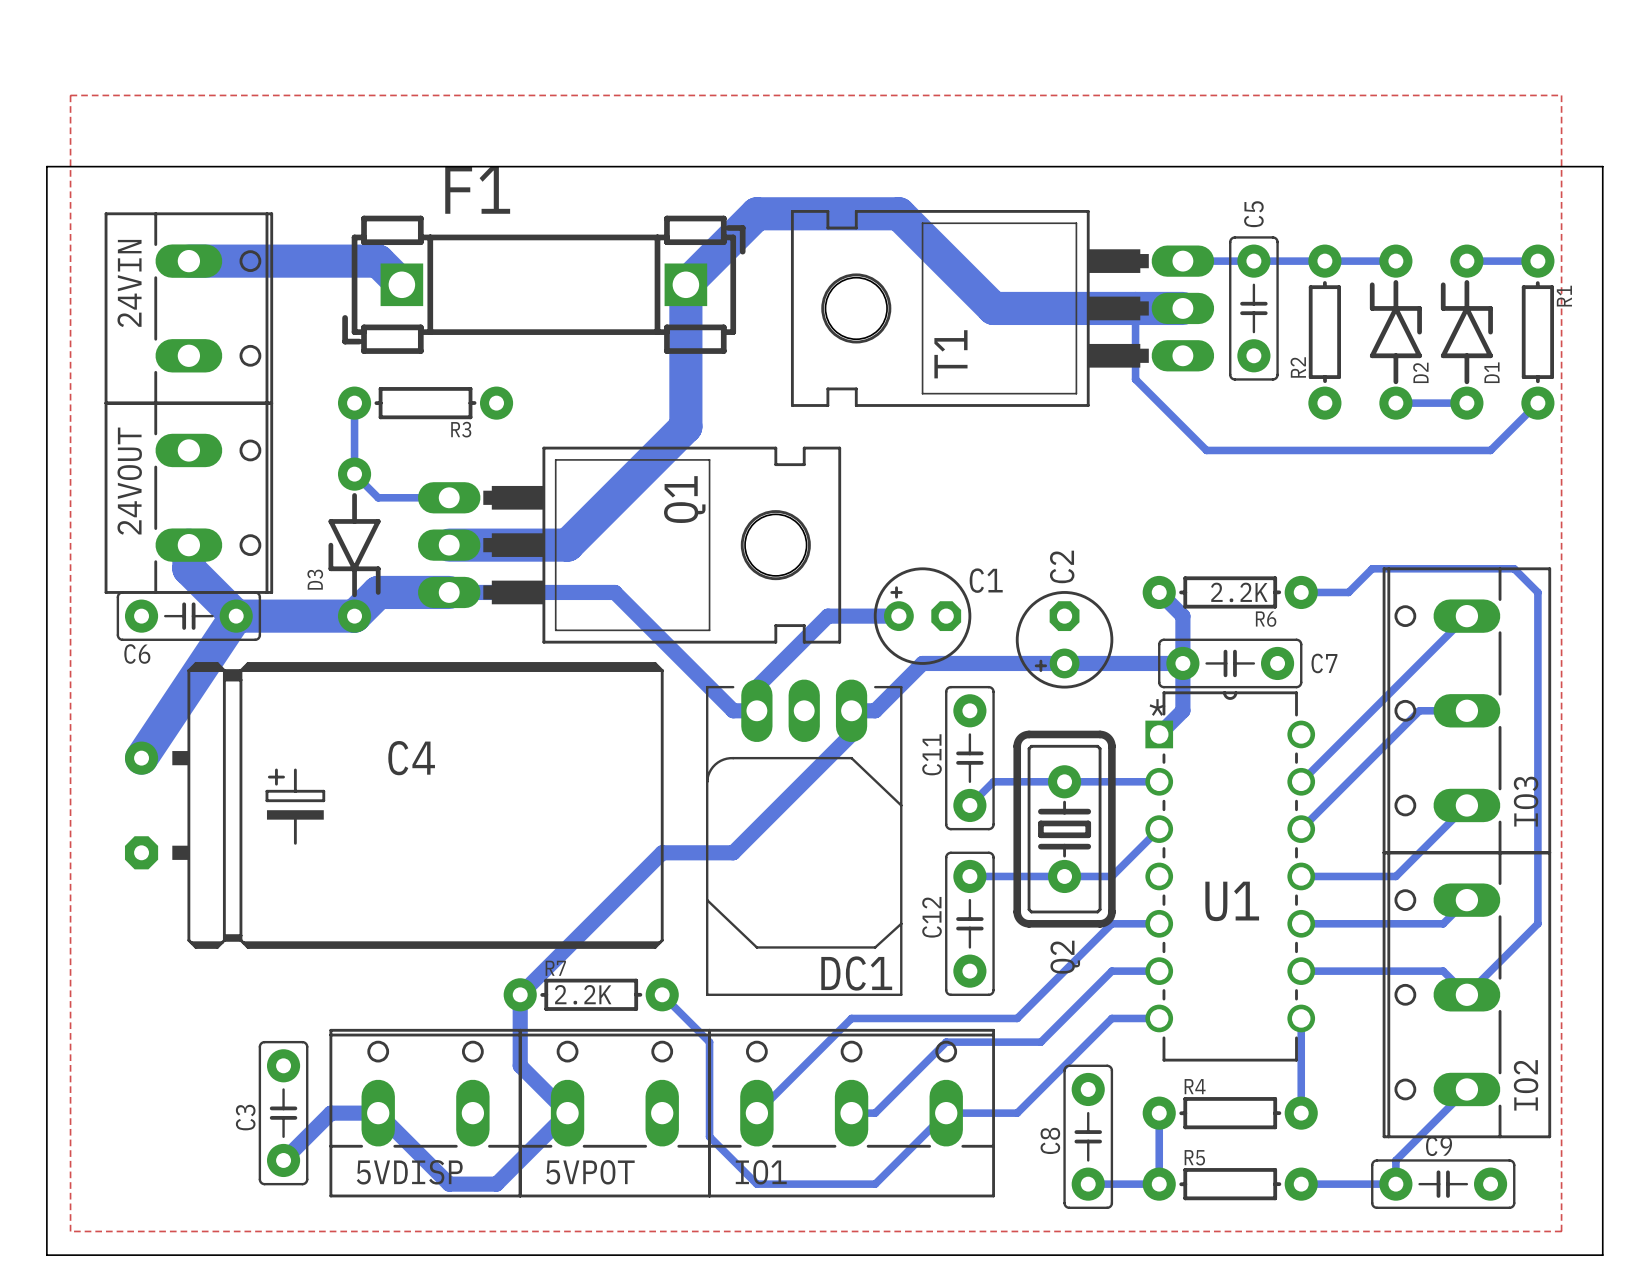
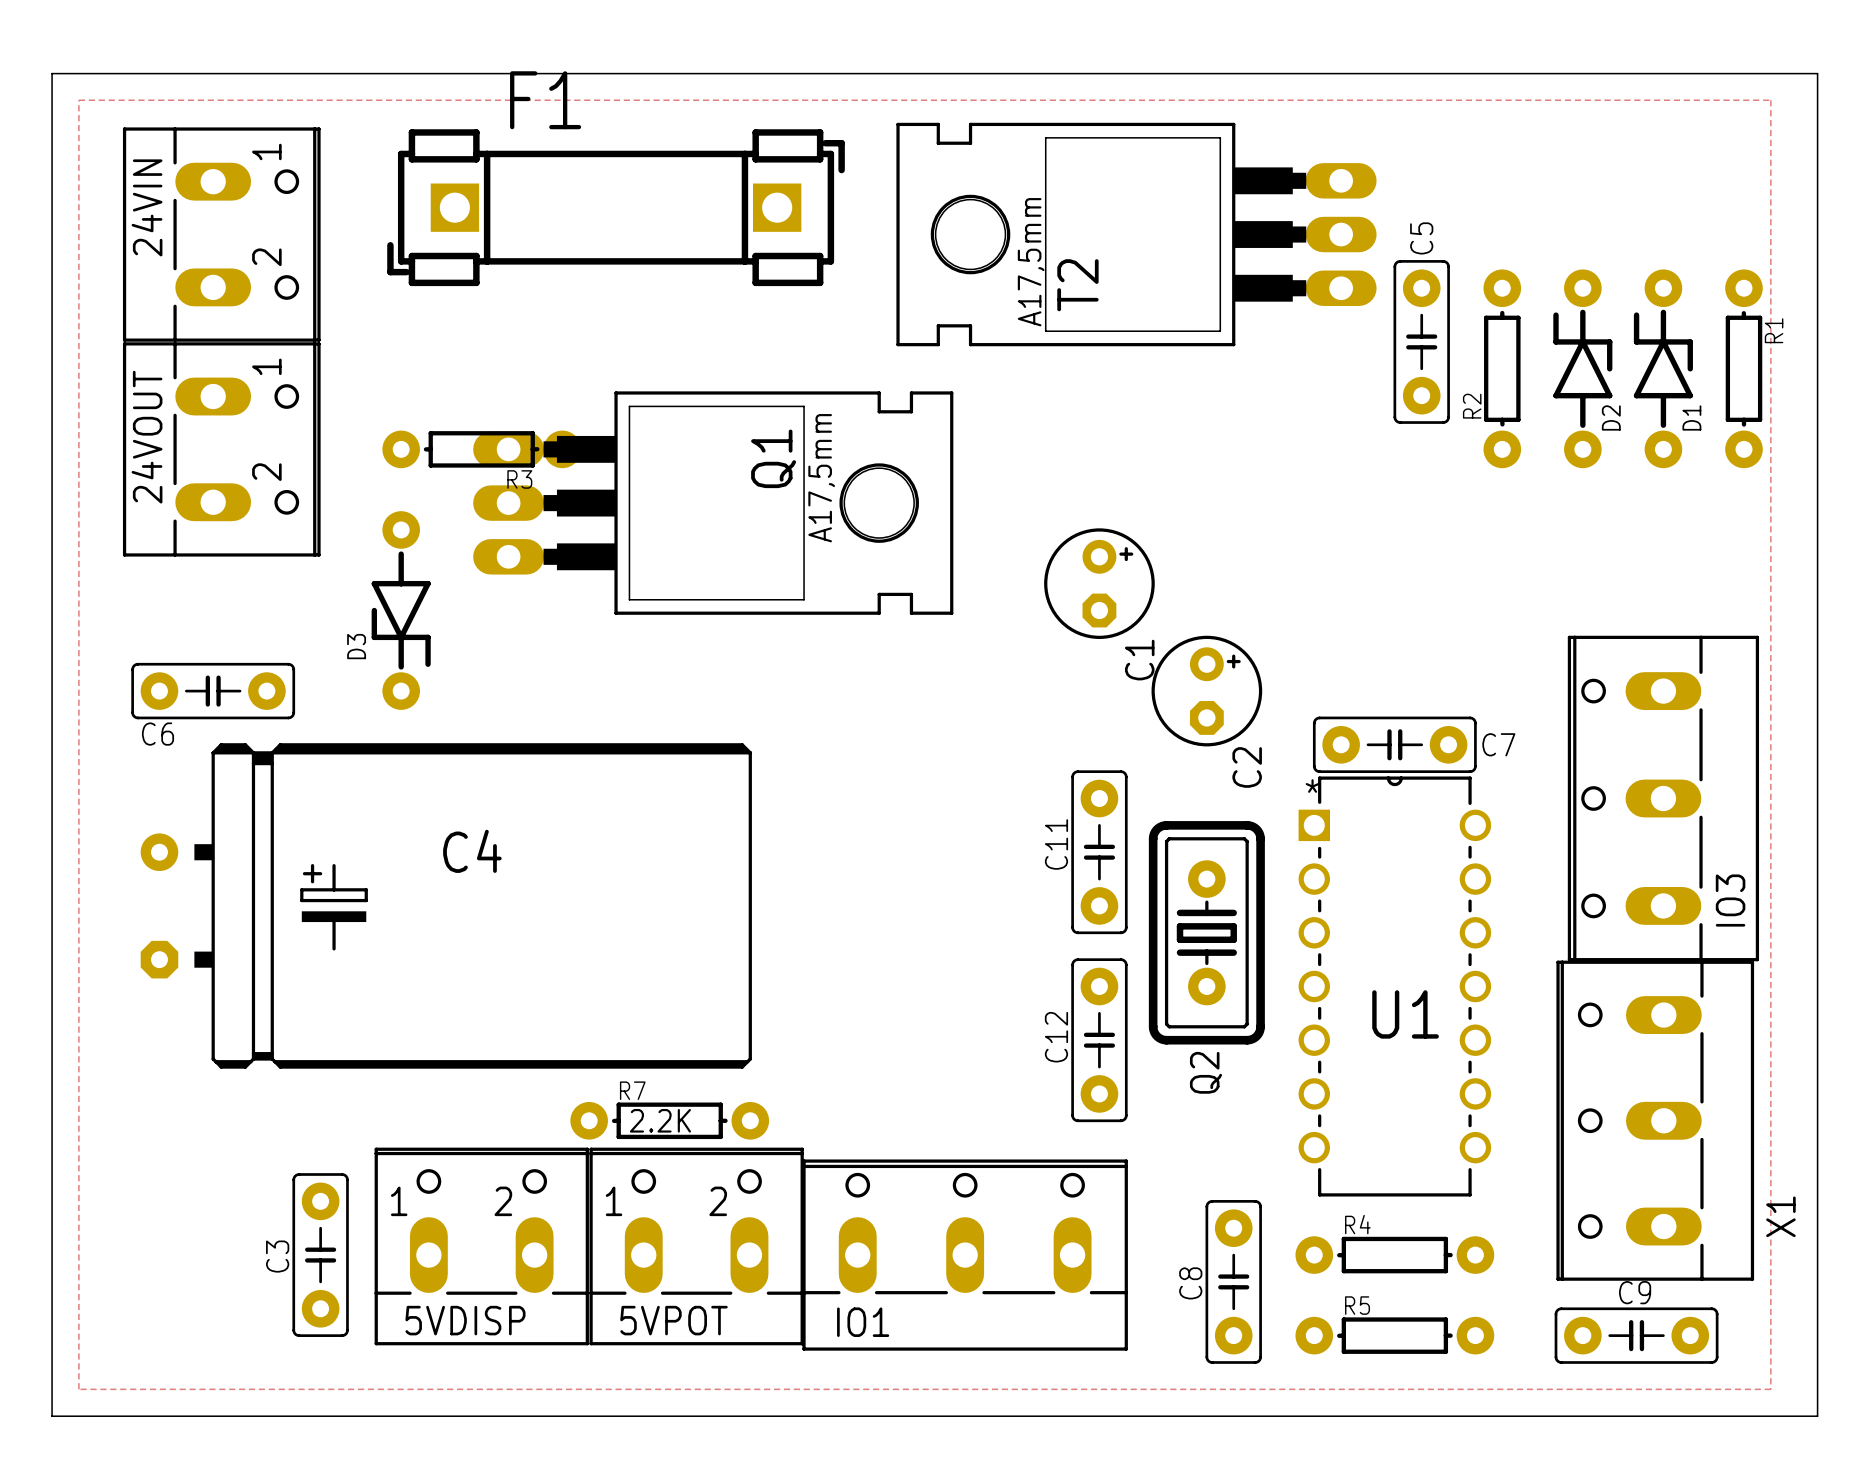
board edge: (46, 166) (1602, 166) -> (52, 181) (52, 73) (1817, 73) (1817, 181)
24VIN footprint: [104, 212, 274, 405] -> [122, 127, 321, 342]
T2: none -> (1136, 234)
bottom track: (188, 261) (378, 261) (401, 284) -> none
bottom track: (1182, 261) (1395, 261) -> none
bottom track: (1466, 261) (1537, 261) -> none
F1 position: (543, 284) -> (616, 207)
T1: (1002, 308) -> none
bottom track: (1135, 308) (1135, 379) (1206, 450) (1490, 450) (1537, 403) -> none
bottom track: (1182, 308) (993, 308) (898, 213) (756, 213) (685, 284) (685, 426) (567, 545) (449, 545) -> none
24VOUT footprint: [104, 401, 274, 594] -> [122, 342, 321, 557]
bottom track: (354, 403) (354, 474) (378, 497) (449, 497) -> none
bottom track: (1395, 403) (1466, 403) -> none
Q1 footprint: [417, 446, 842, 644] -> [473, 391, 954, 615]
bottom track: (188, 545) (188, 568) (236, 616) -> none
bottom track: (1159, 592) (1182, 616) (1182, 710) (1159, 734) -> none
R6: 2.2K (1230, 592) -> none
bottom track: (1301, 592) (1348, 592) (1372, 568) (1514, 568) (1537, 592) (1537, 923) (1466, 994) (1443, 971) (1301, 971) -> none
bottom track: (236, 616) (354, 616) (378, 592) (614, 592) (733, 710) (756, 710) (756, 687) (827, 616) (898, 616) -> none
bottom track: (236, 616) (141, 758) -> none
C1 rotation: 0° (922, 616) -> 90° clockwise (1099, 583)
C1 position: (922, 616) -> (1099, 583)
bottom track: (1466, 616) (1301, 781) -> none
C2 rotation: 0° (1064, 639) -> 180° (1206, 691)
bottom track: (1182, 663) (922, 663) (875, 710) (851, 710) (851, 734) (733, 852) (662, 852) (520, 994) (520, 1065) (567, 1113) (496, 1184) (449, 1184) (378, 1113) (330, 1113) (283, 1160) -> none
bottom track: (1466, 710) (1419, 710) (1301, 829) -> none
bottom track: (1159, 781) (993, 781) (969, 805) -> none
bottom track: (1466, 805) (1395, 876) (1301, 876) -> none
bottom track: (1159, 829) (1111, 876) (969, 876) -> none
DC1: (804, 837) -> none
bottom track: (1466, 900) (1443, 923) (1301, 923) -> none
bottom track: (1159, 923) (1111, 923) (1017, 1018) (851, 1018) (756, 1113) -> none
bottom track: (1159, 971) (1111, 971) (1040, 1042) (946, 1042) (875, 1113) (851, 1113) -> none
bottom track: (662, 994) (709, 1042) (709, 1136) (756, 1184) (875, 1184) (946, 1113) (1017, 1113) (1111, 1018) (1159, 1018) -> none
X1: none -> (1655, 1120)
IO2: (1466, 994) -> none
bottom track: (1301, 1018) (1301, 1113) -> none
5VDISP footprint: [329, 1028, 522, 1198] -> [374, 1147, 589, 1346]
5VPOT footprint: [518, 1028, 711, 1198] -> [589, 1147, 804, 1346]
bottom track: (1466, 1089) (1395, 1160) (1395, 1184) (1301, 1184) -> none
bottom track: (1159, 1113) (1159, 1184) (1088, 1184) -> none

